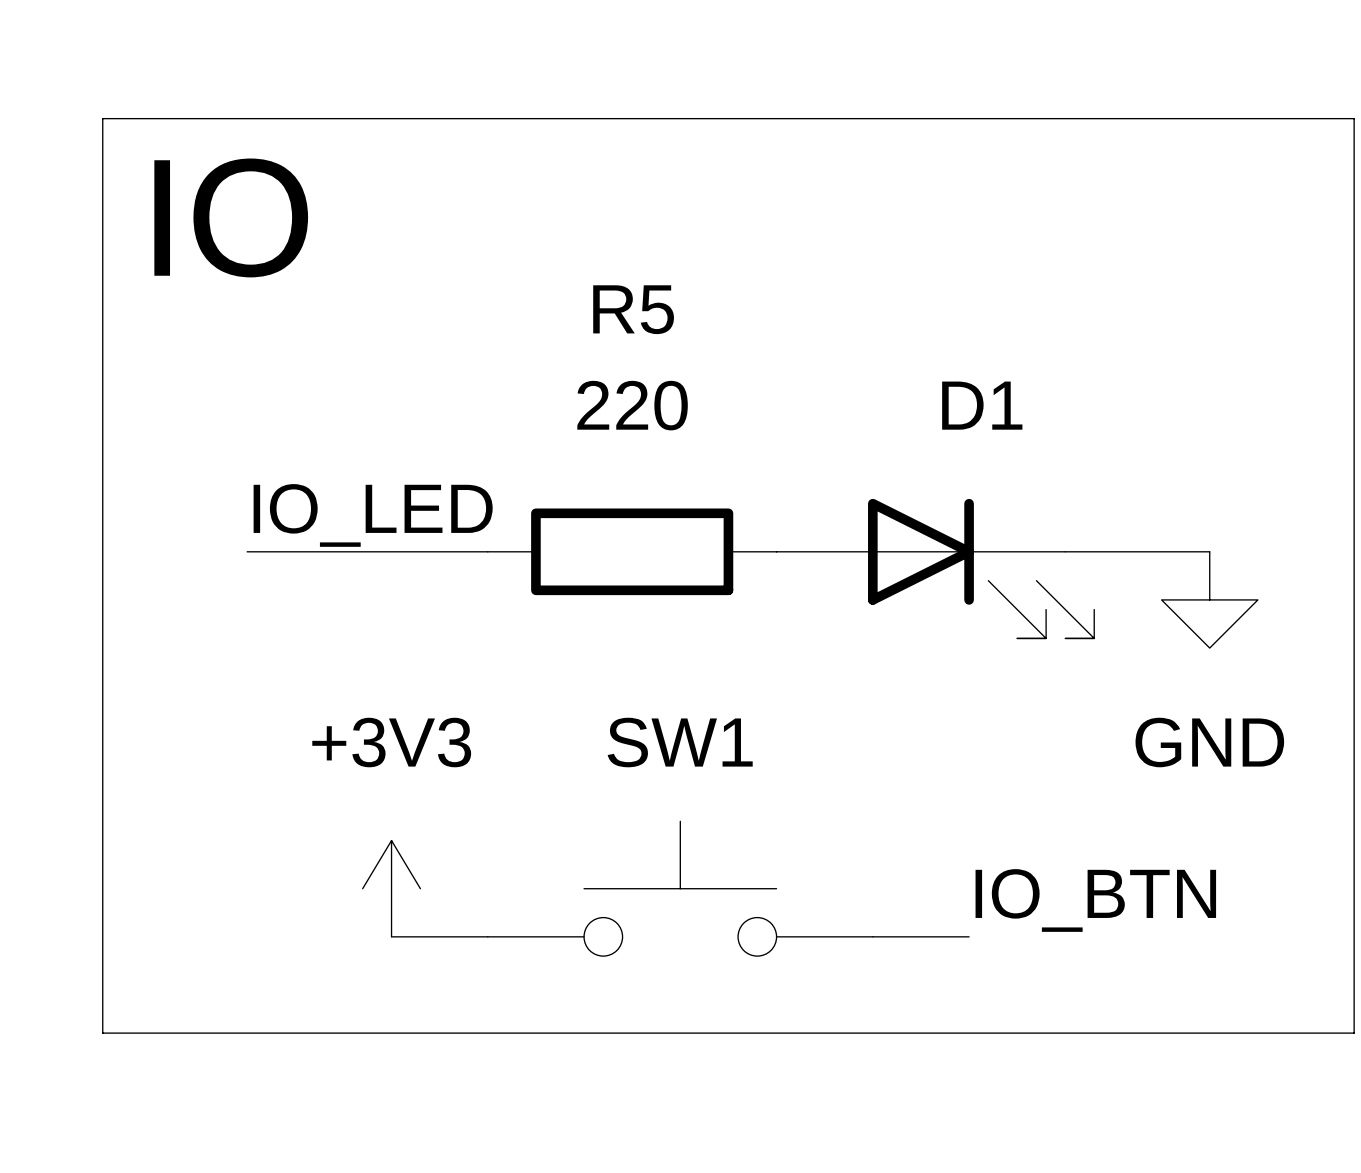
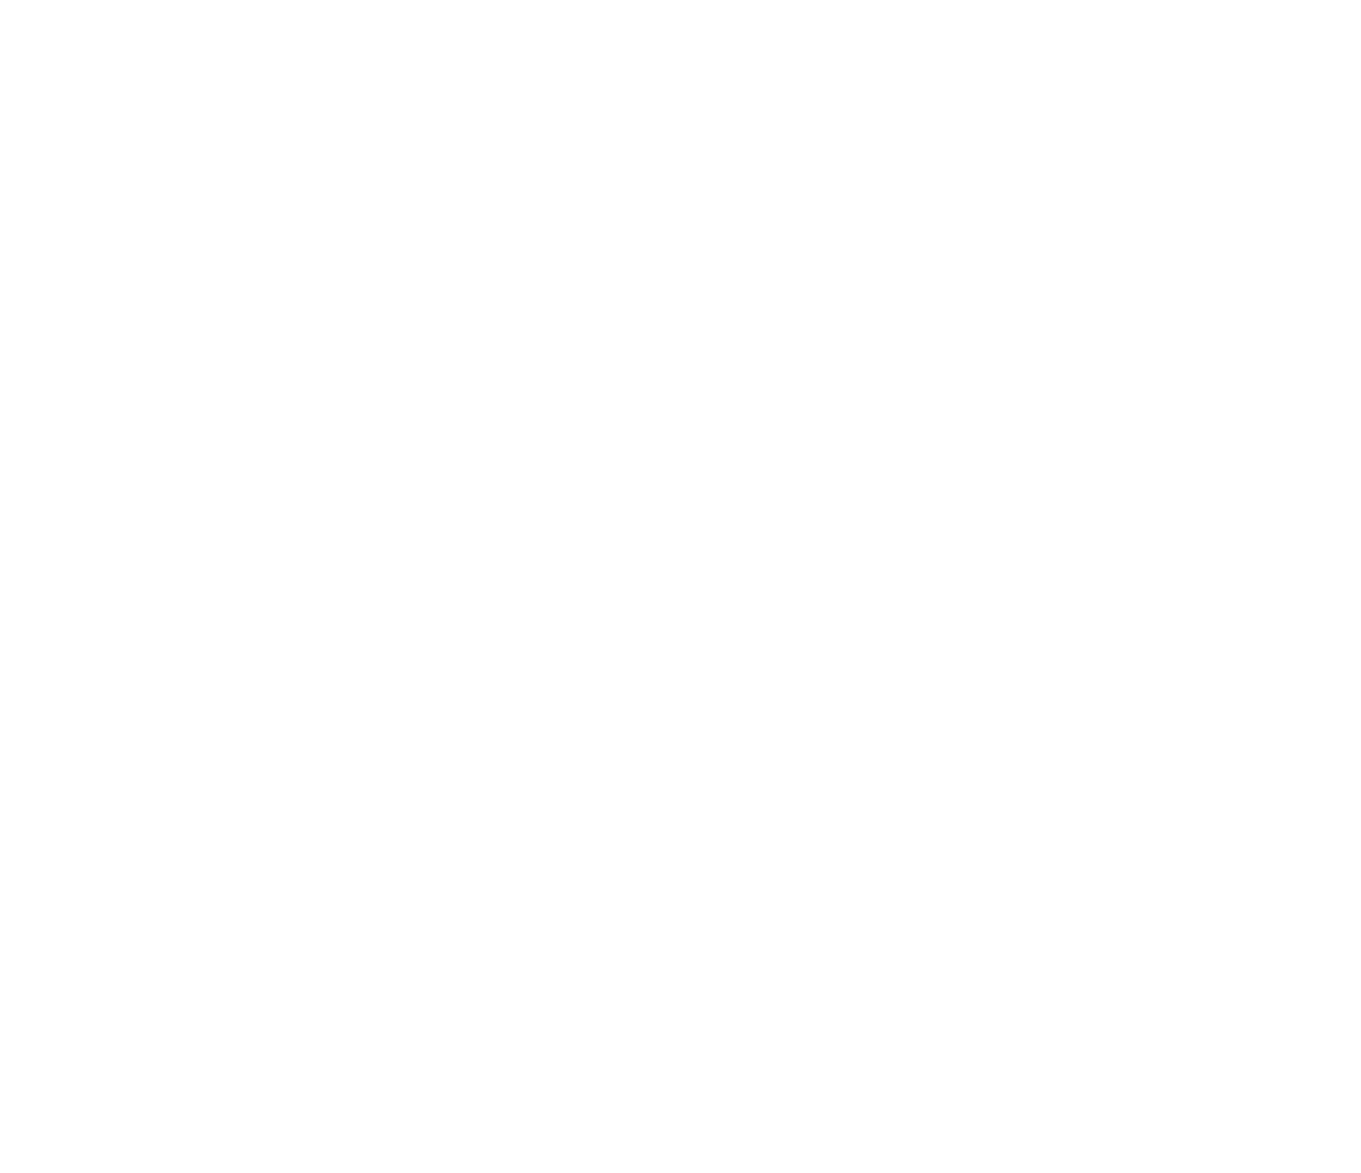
line: (102, 118) (1354, 118) (1354, 1033) (102, 1033) (102, 118) -> none
text: IO (231, 217) -> none
label: IO_LED (373, 515) -> none
wire: (247, 551) (487, 551) -> none
R5: 220 (632, 551) -> none
wire: (1065, 551) (1209, 551) -> none
D1: (935, 568) -> none
power symbol: GND (1209, 599) -> none
power symbol: +3V3 (391, 888) -> none
SW1: (680, 888) -> none
label: IO_BTN (1095, 900) -> none
wire: (391, 936) (487, 936) -> none
wire: (872, 936) (969, 936) -> none

